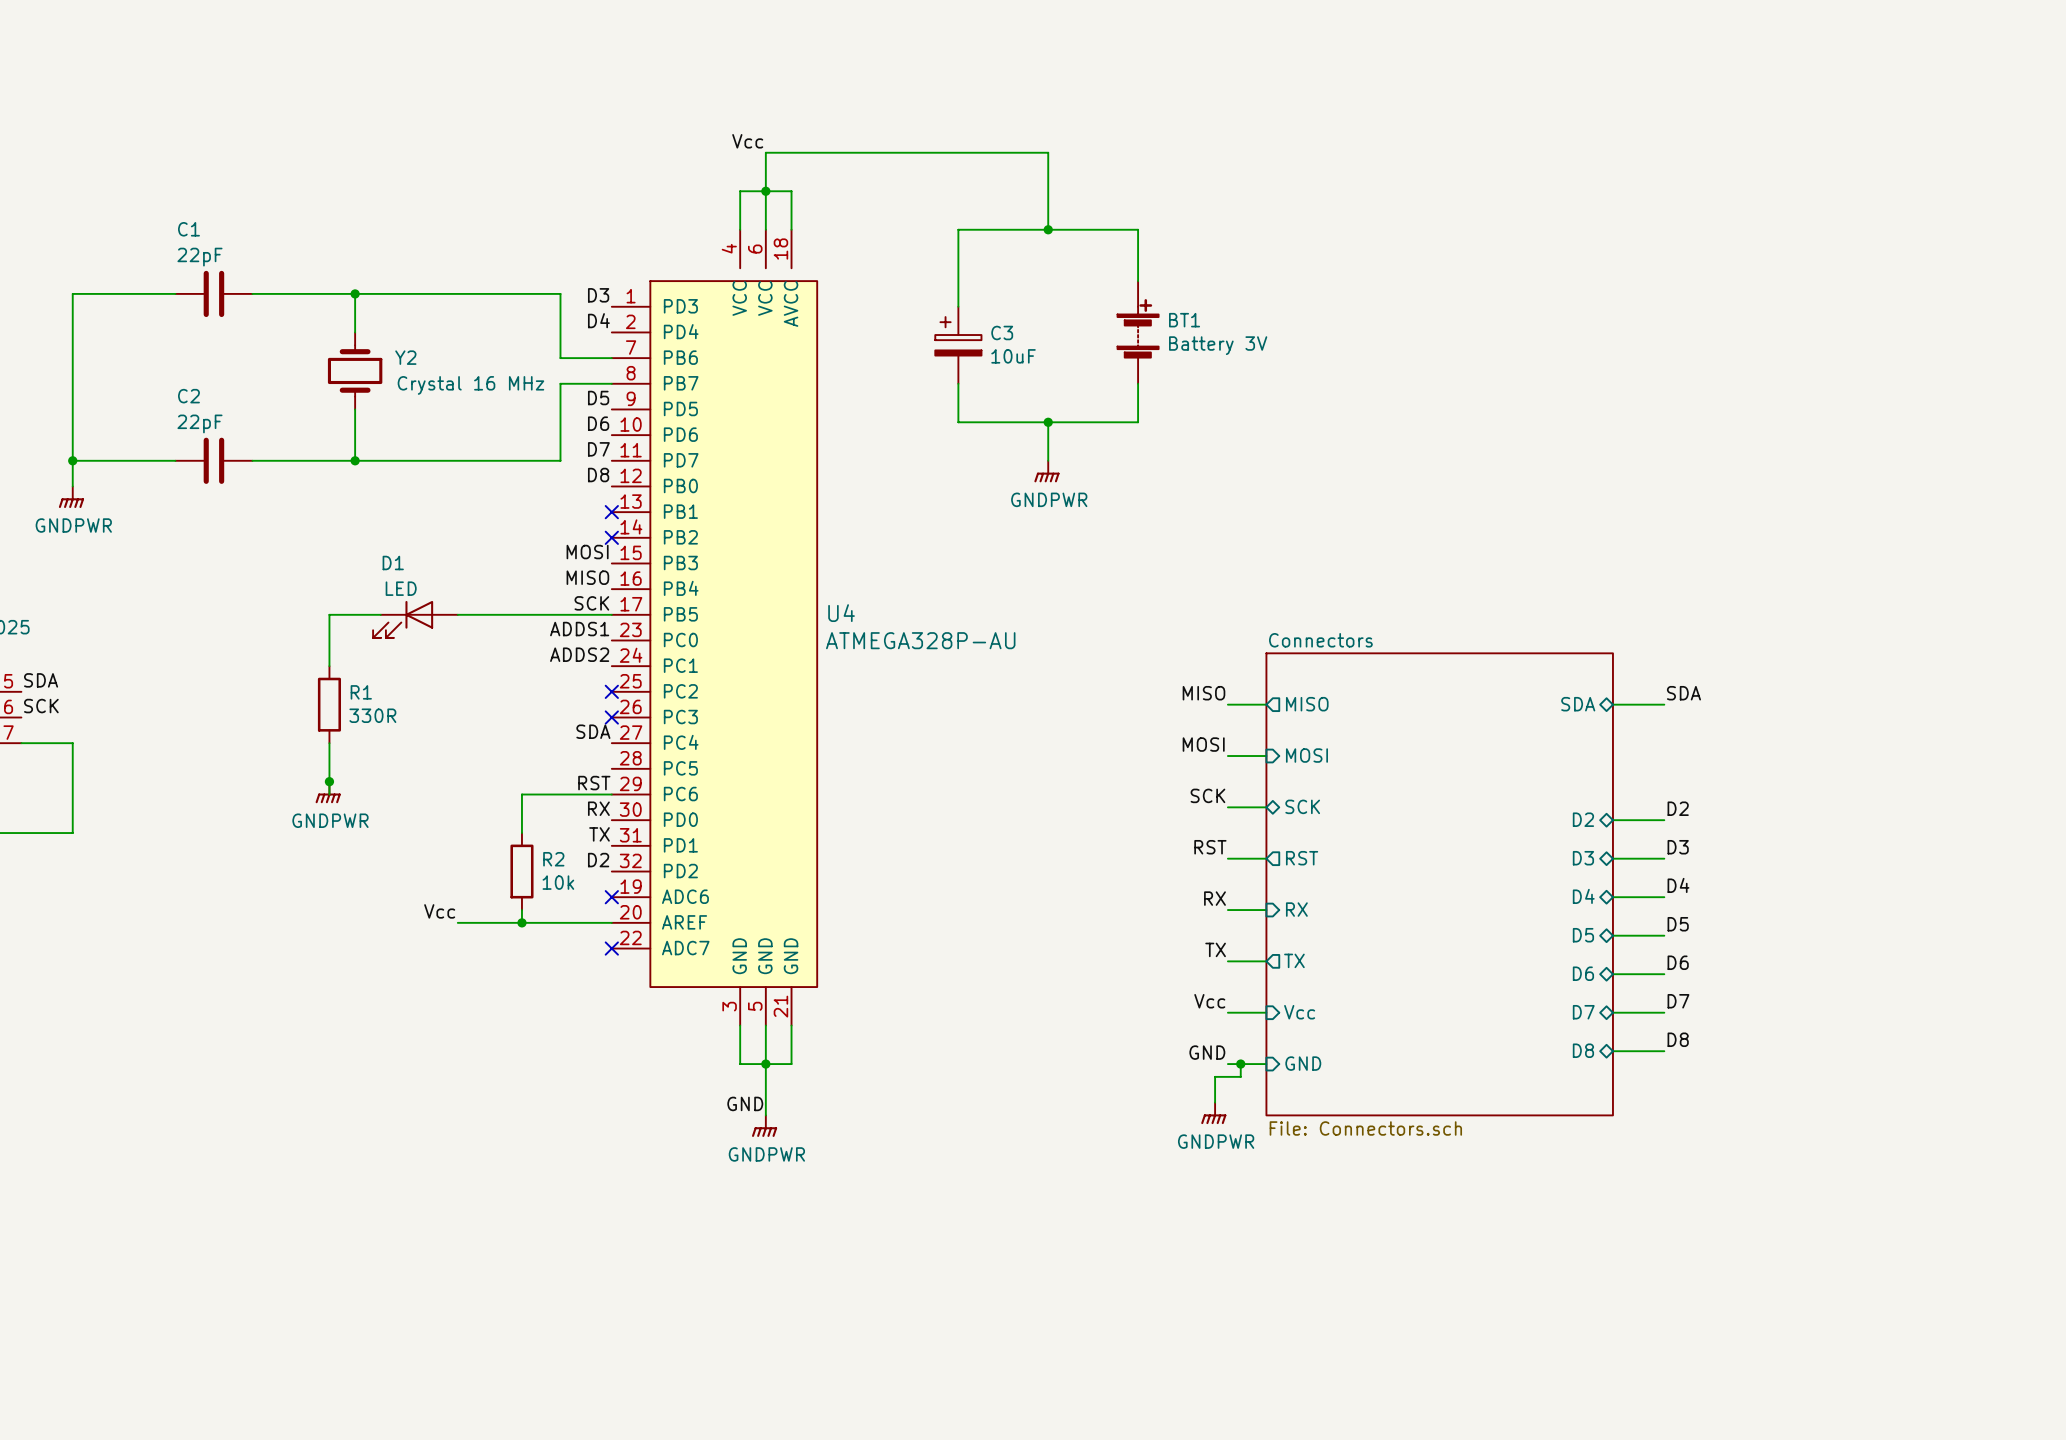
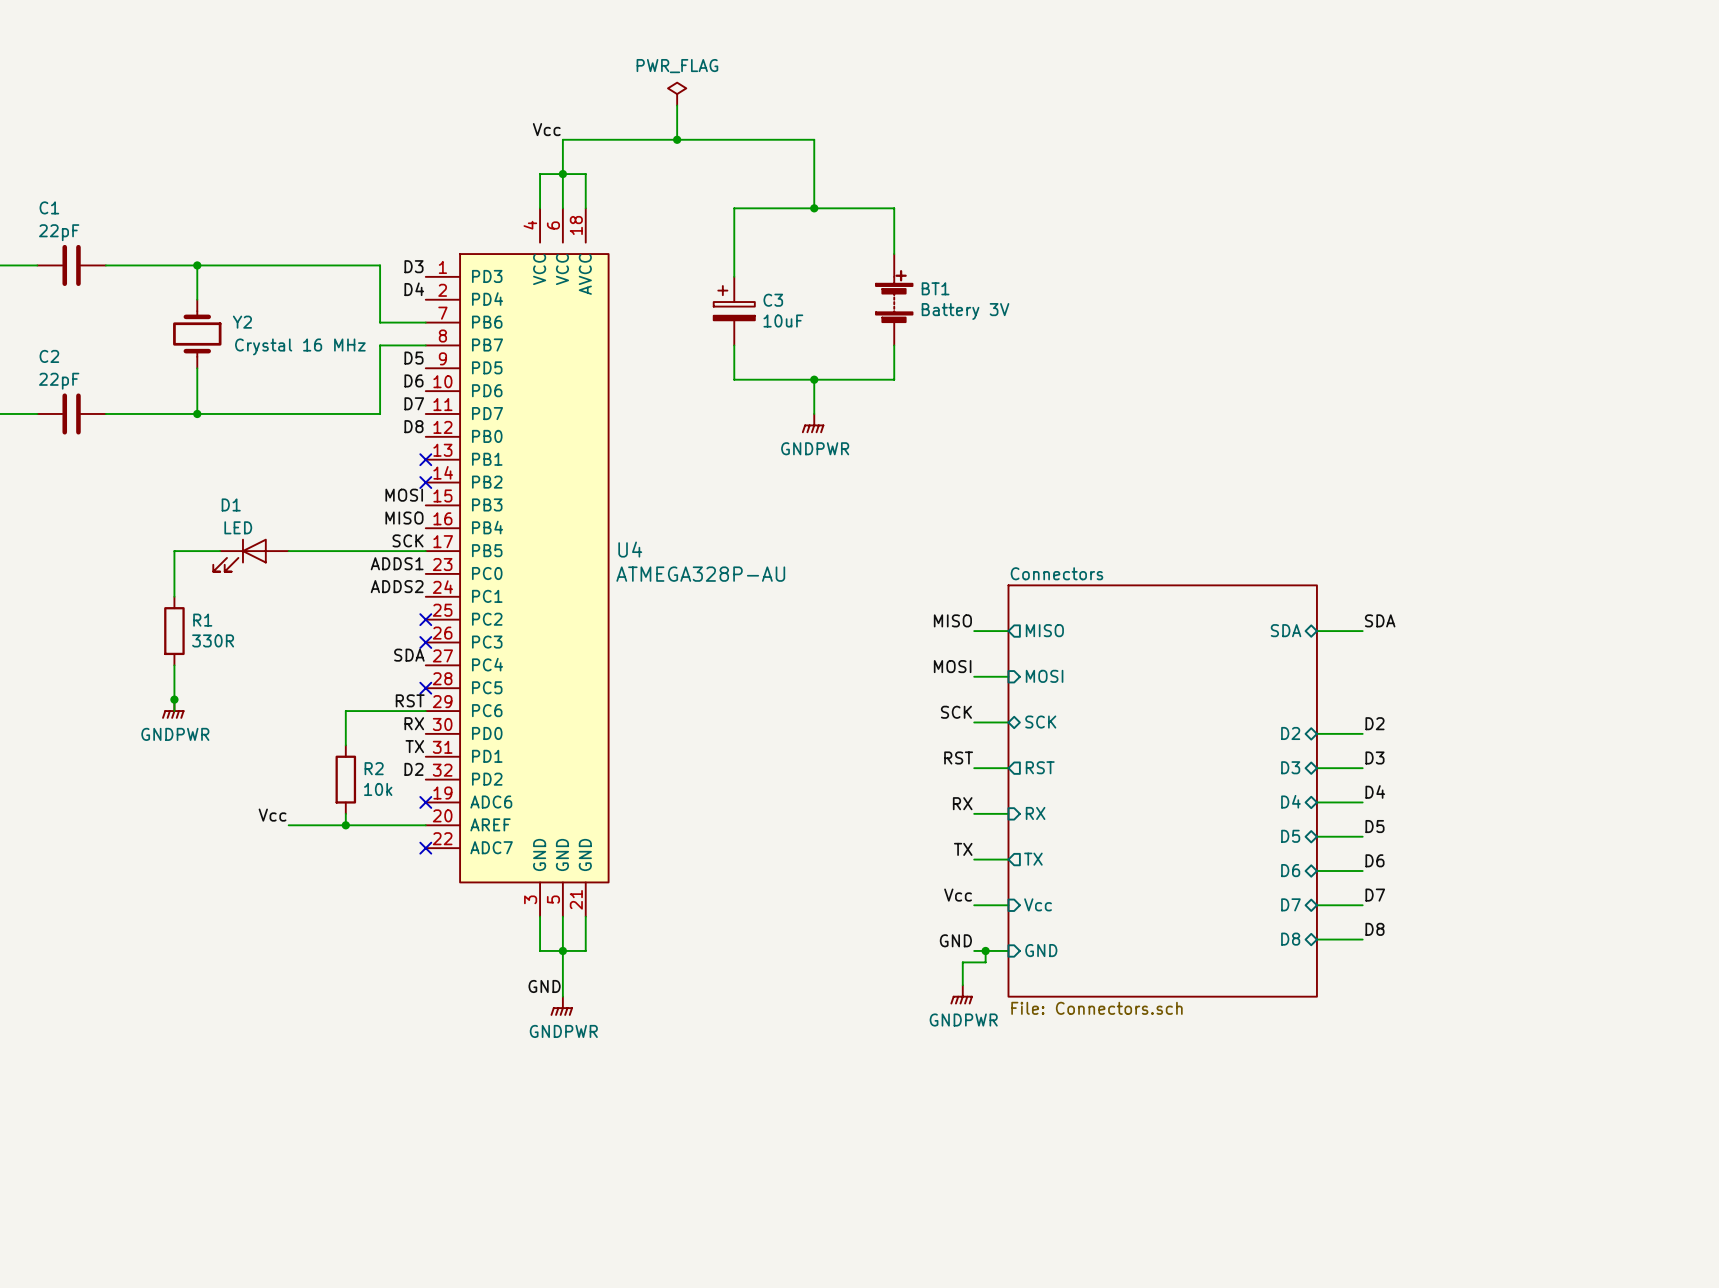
power symbol: none -> PWR_FLAG (677, 94)
wire: none -> (677, 105) (677, 139)
junction: none -> (677, 139)
no-connect mark: none -> (425, 688)

